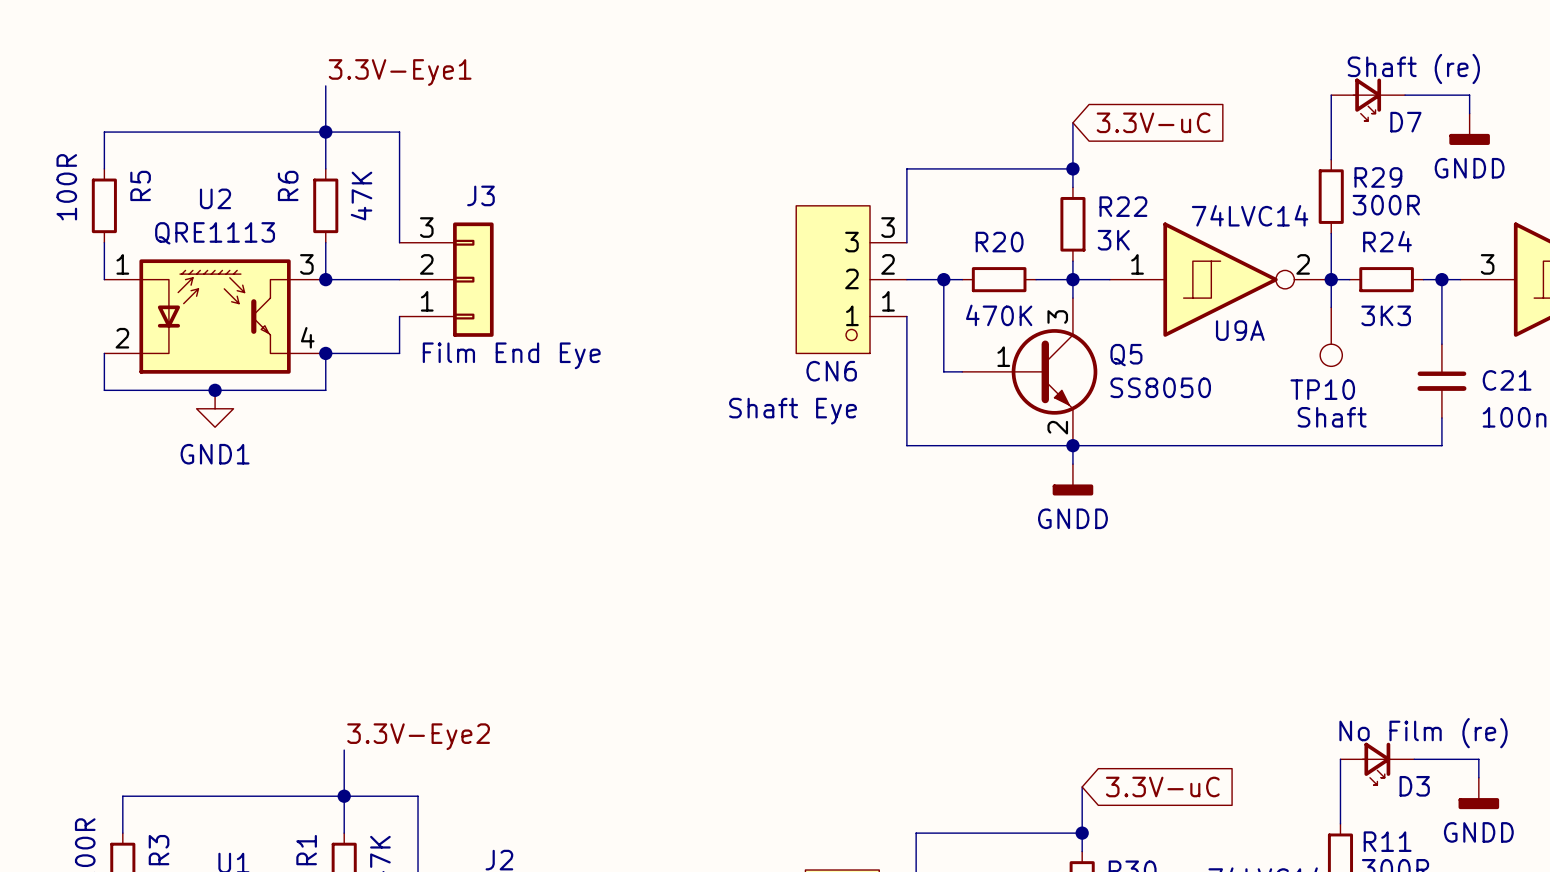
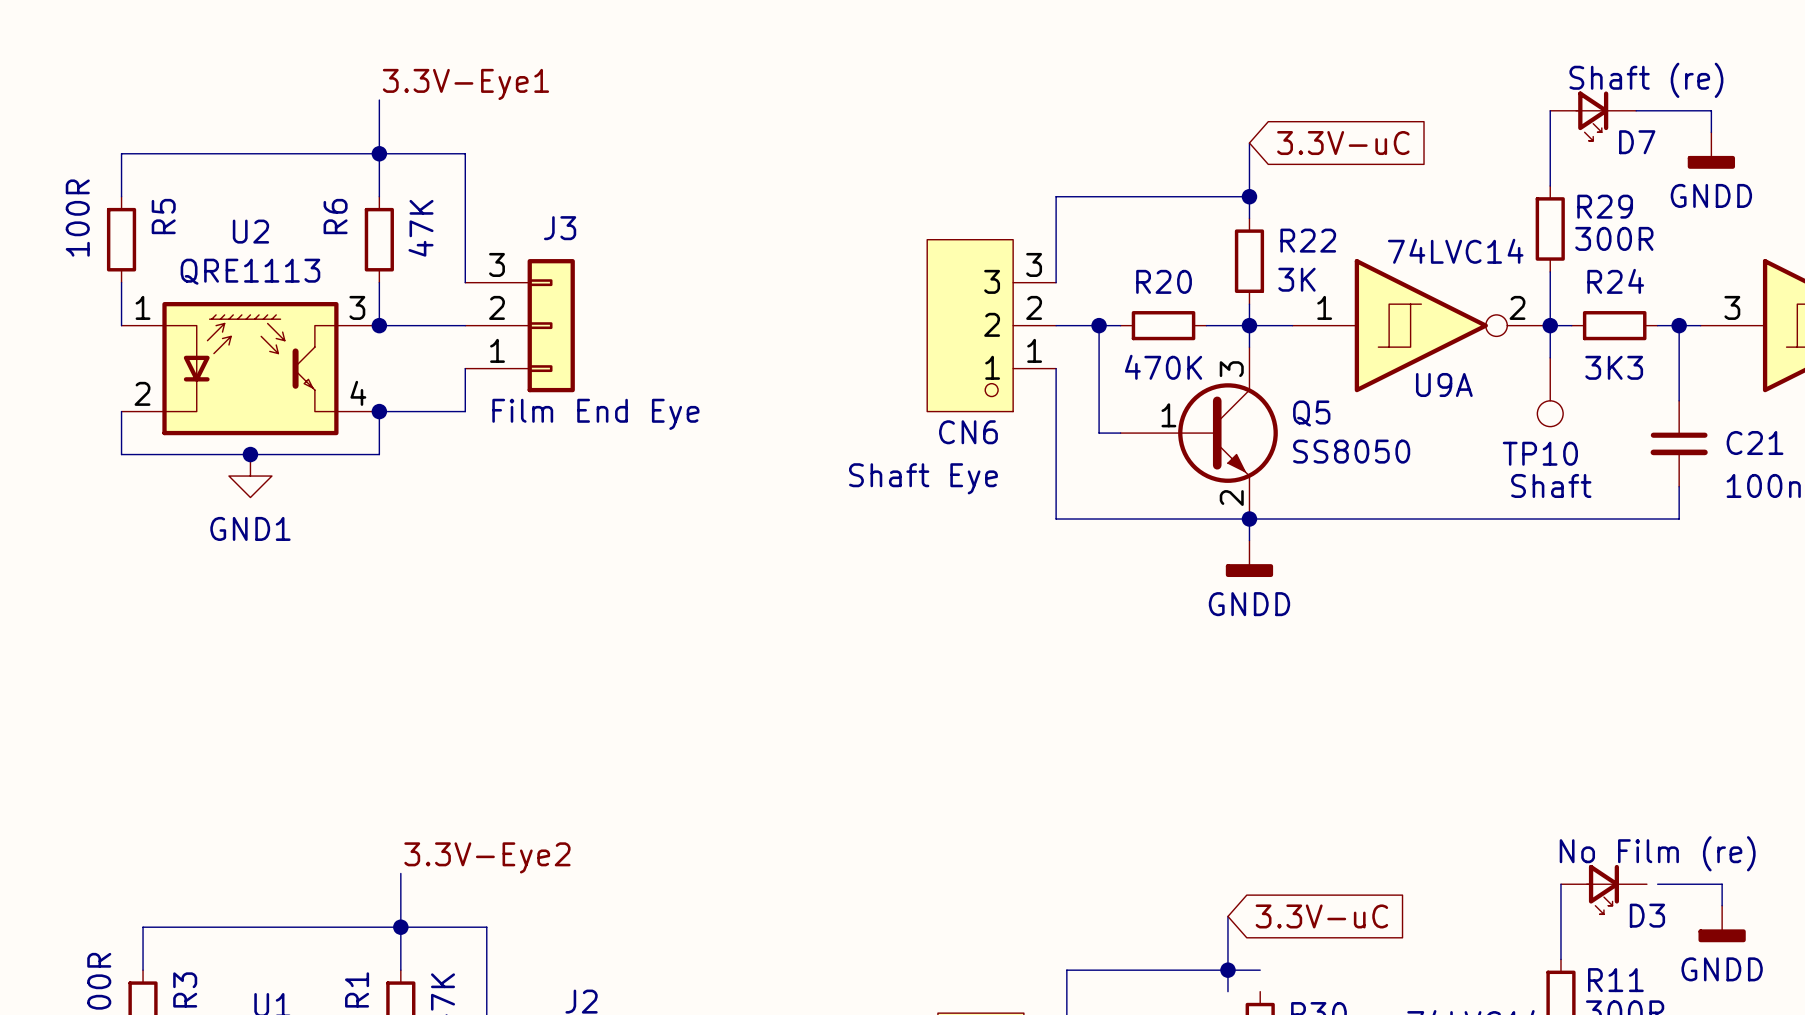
wire: (1414, 759) (1423, 759) -> none
wire: (1082, 786) (1082, 851) -> (1227, 916) (1227, 991)
global label position: 3.3V-uC (1162, 786) -> 3.3V-uC (1321, 916)
junction position: (1082, 833) -> (1227, 970)

